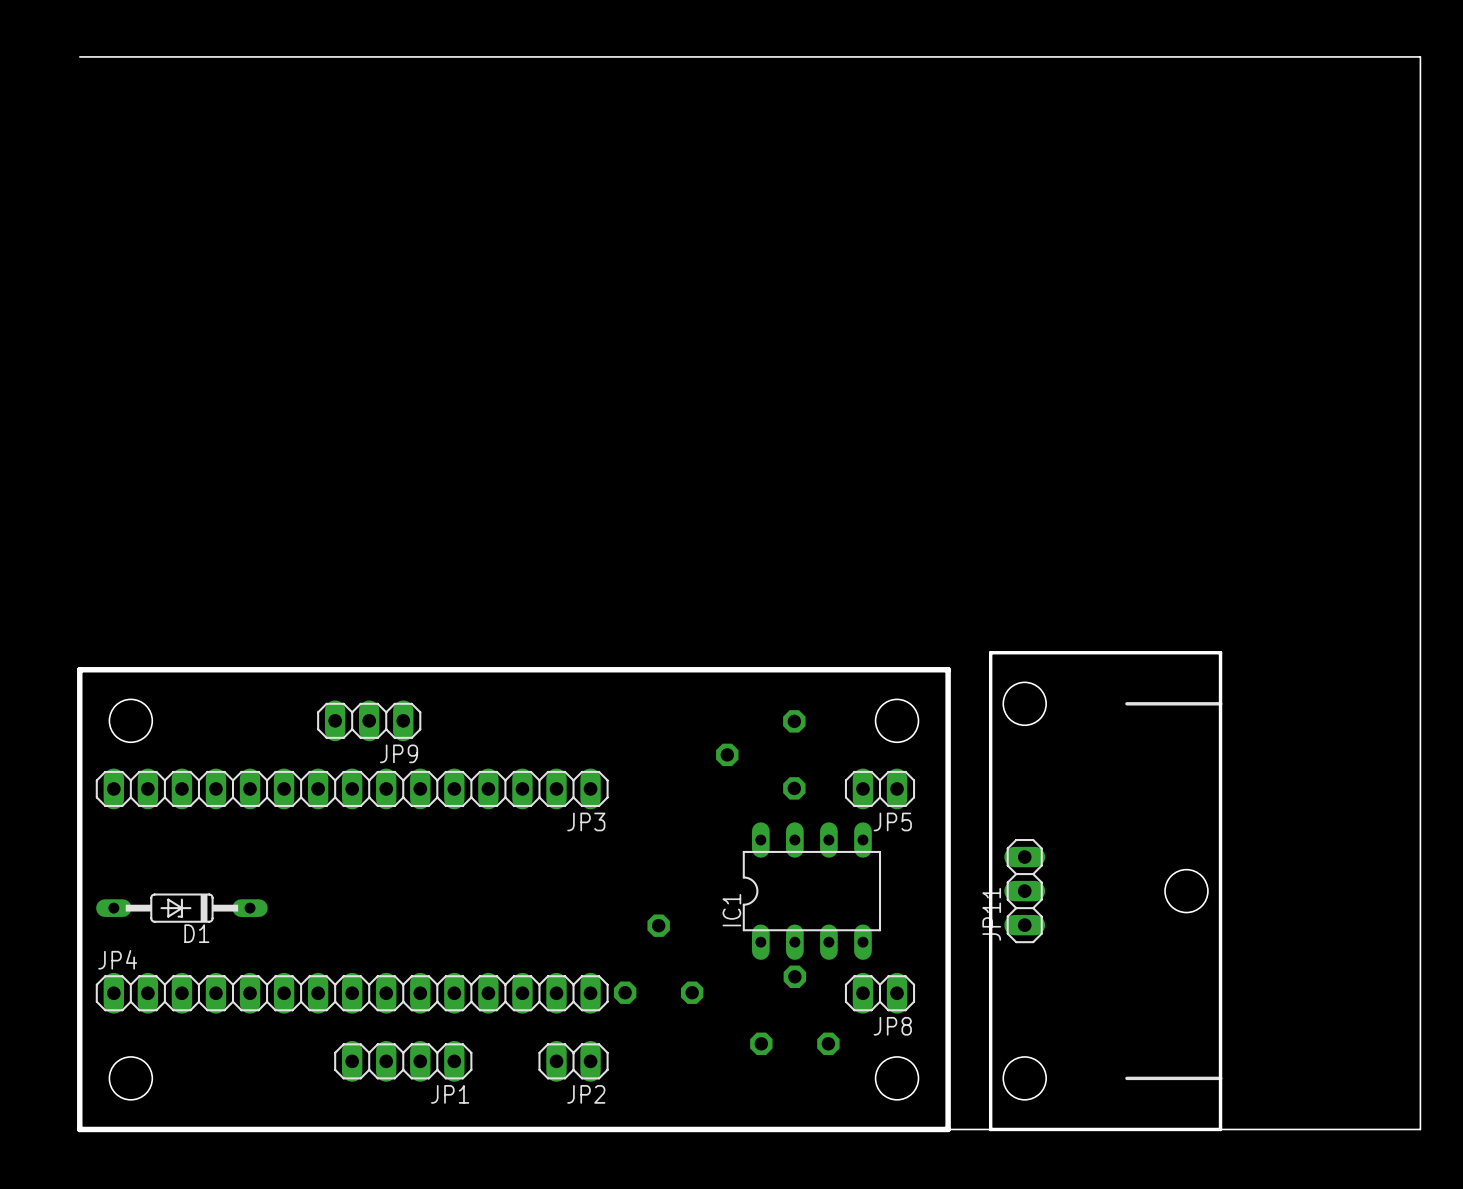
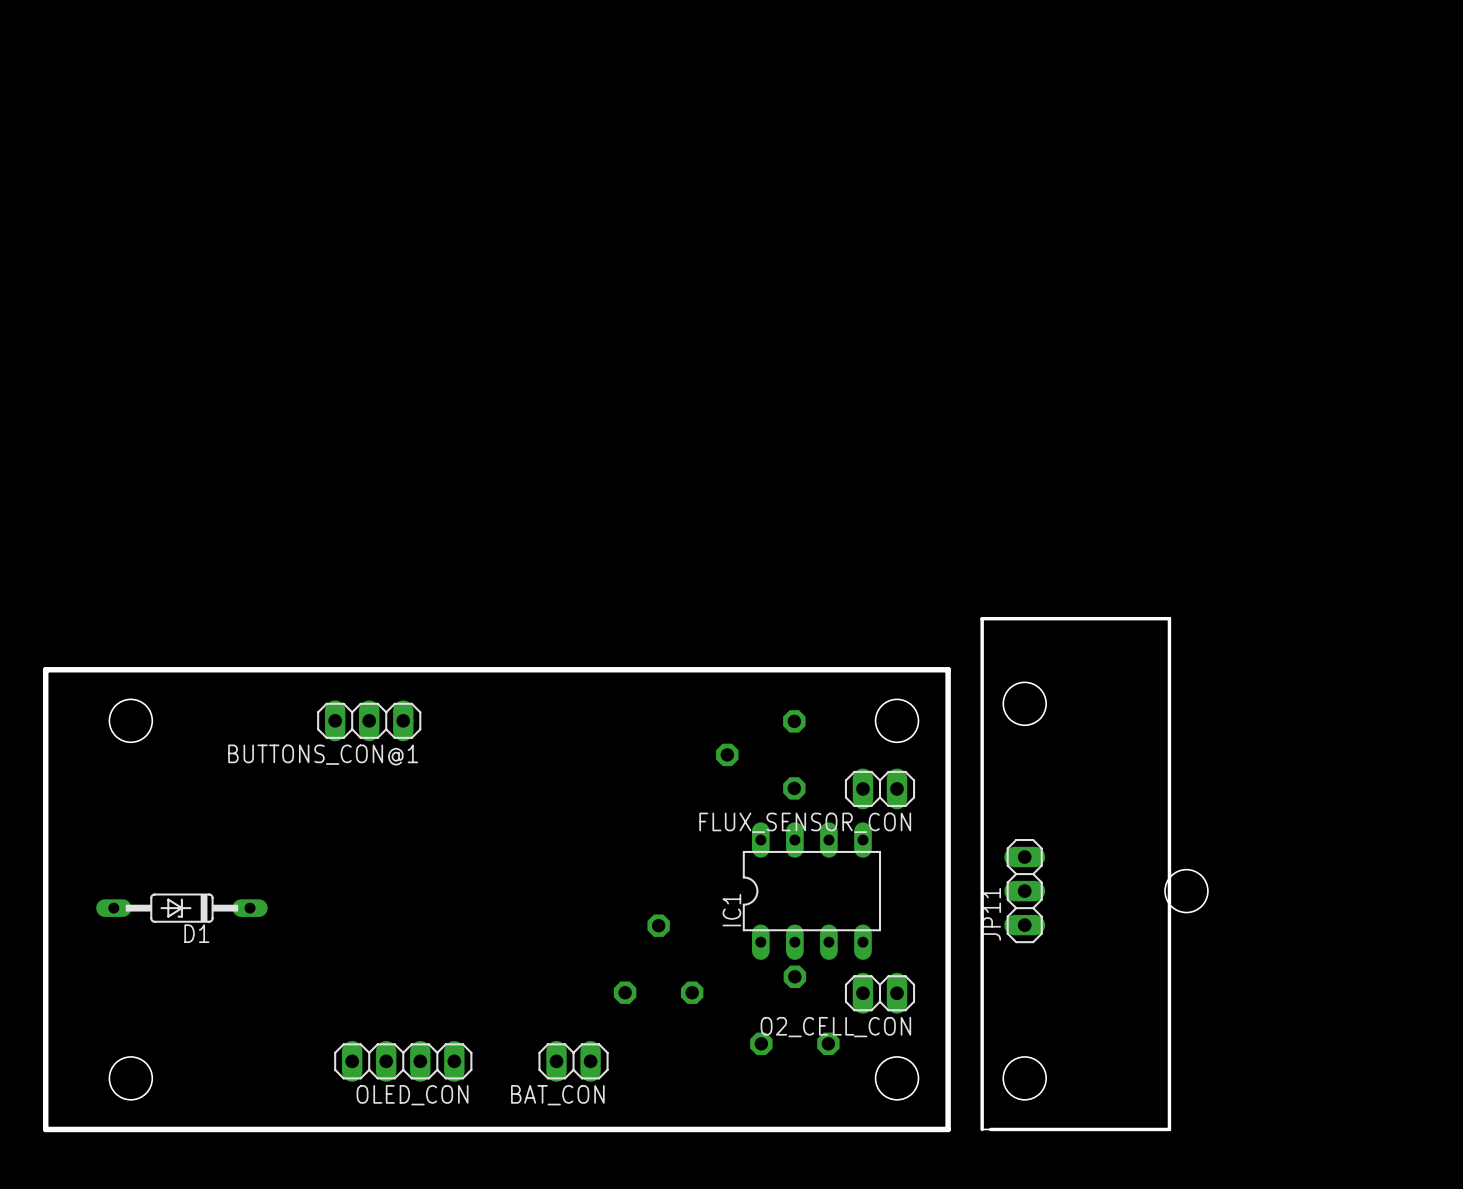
board edge: (79, 56) (1420, 56) (1420, 1129) (1220, 1129) -> none
board edge: (79, 669) (79, 1129) (982, 1129) -> (79, 669) (45, 669) (45, 1129) (79, 1129)
line: (1126, 703) (1220, 703) -> none
JP9 name: JP9 (399, 753) -> BUTTONS_CON@1 (323, 755)
JP3: (352, 788) -> none
JP5 name: JP5 (892, 821) -> FLUX_SENSOR_CON (805, 822)
JP4: (352, 993) -> none
JP8 name: JP8 (892, 1026) -> O2_CELL_CON (835, 1027)
line: (1126, 1078) (1220, 1078) -> none
JP1 name: JP1 (450, 1094) -> OLED_CON (412, 1095)
JP2 name: JP2 (586, 1094) -> BAT_CON (557, 1095)
board edge: (990, 1129) (990, 652) (1220, 652) (1220, 1129) -> none
board edge: (1169, 1129) (1220, 1129) -> (1169, 1129) (1169, 618) (982, 618) (982, 1129)

